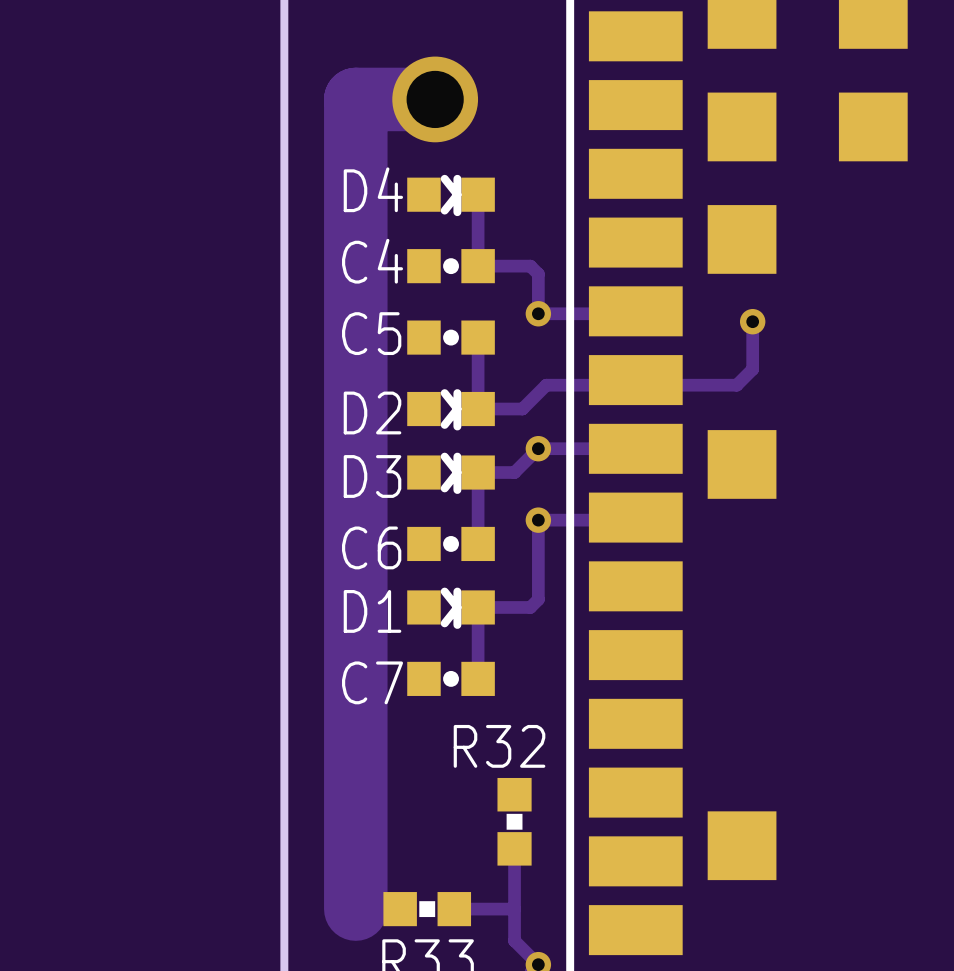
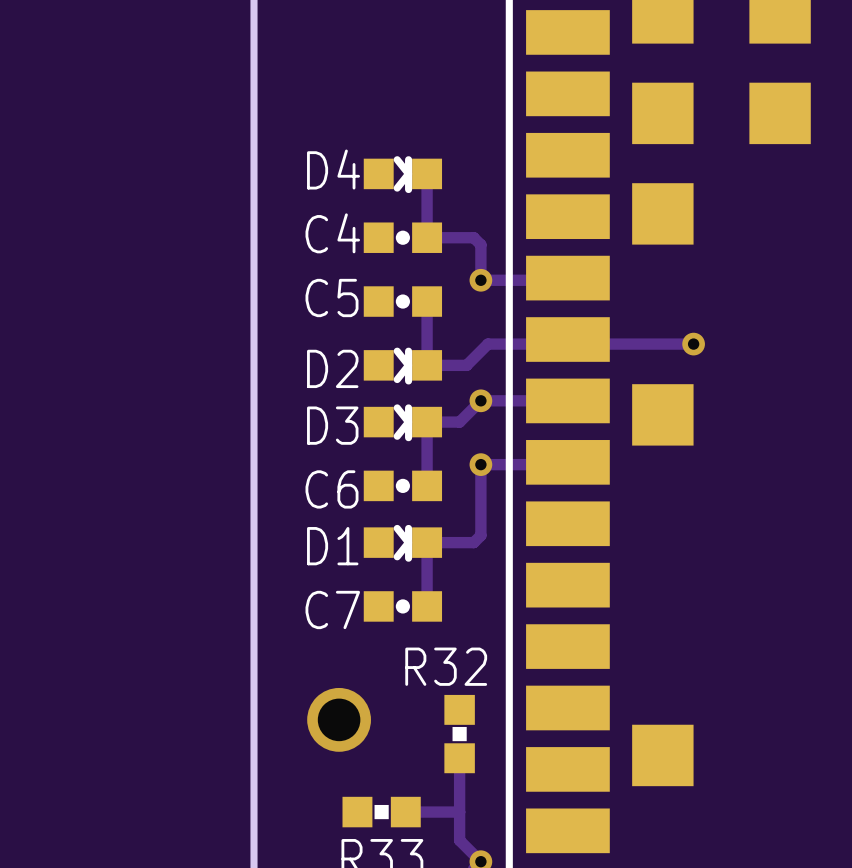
track: (435, 99) (355, 99) (355, 909) (400, 909) -> none
via: (435, 99) -> none
track: (752, 321) (752, 369) (736, 385) -> (693, 344) (658, 344)
via position: (752, 321) -> (693, 344)
via: none -> (339, 719)

